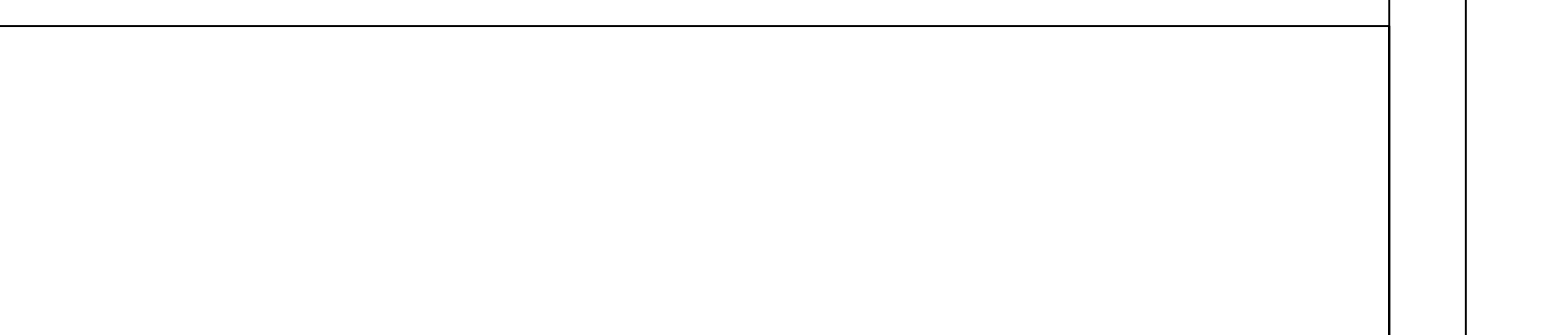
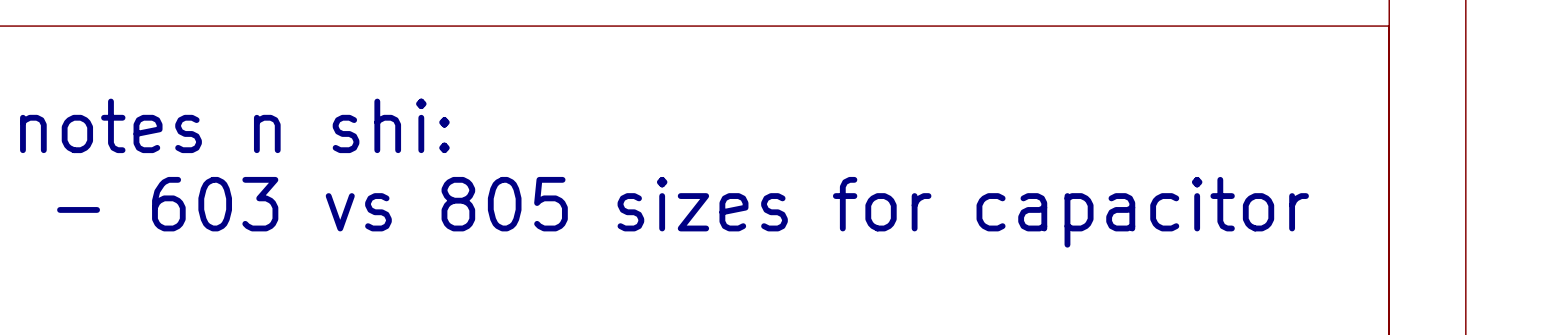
text: none -> notes n shi: (234, 125)
text: none -> - 603 vs 805 sizes for capacitor (683, 212)

